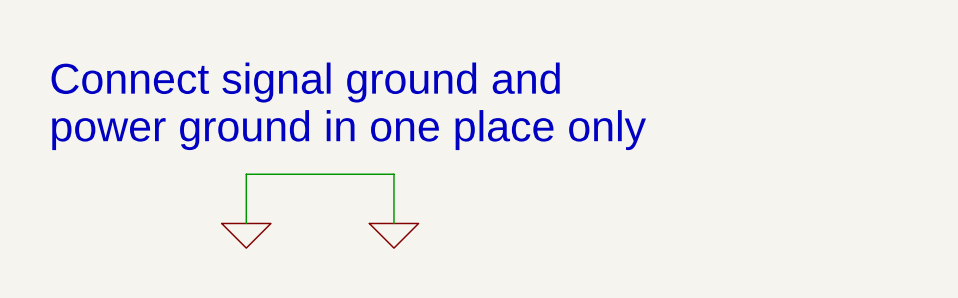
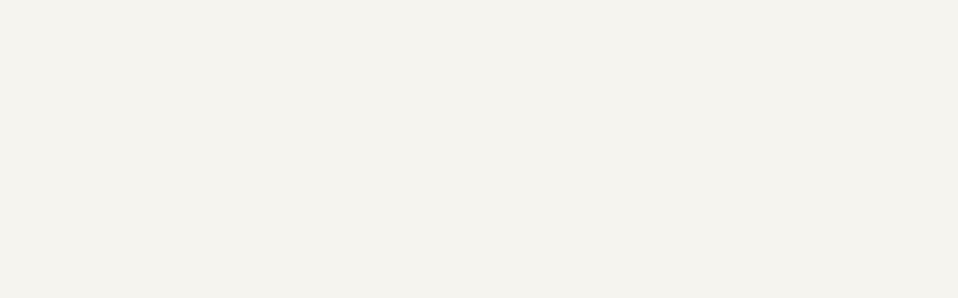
text: Connect signal ground and (305, 82) -> none
text: power ground in one place only (349, 130) -> none
wire: (246, 223) (246, 174) (393, 174) (393, 223) -> none
power symbol: (246, 235) -> none
power symbol: (393, 235) -> none

